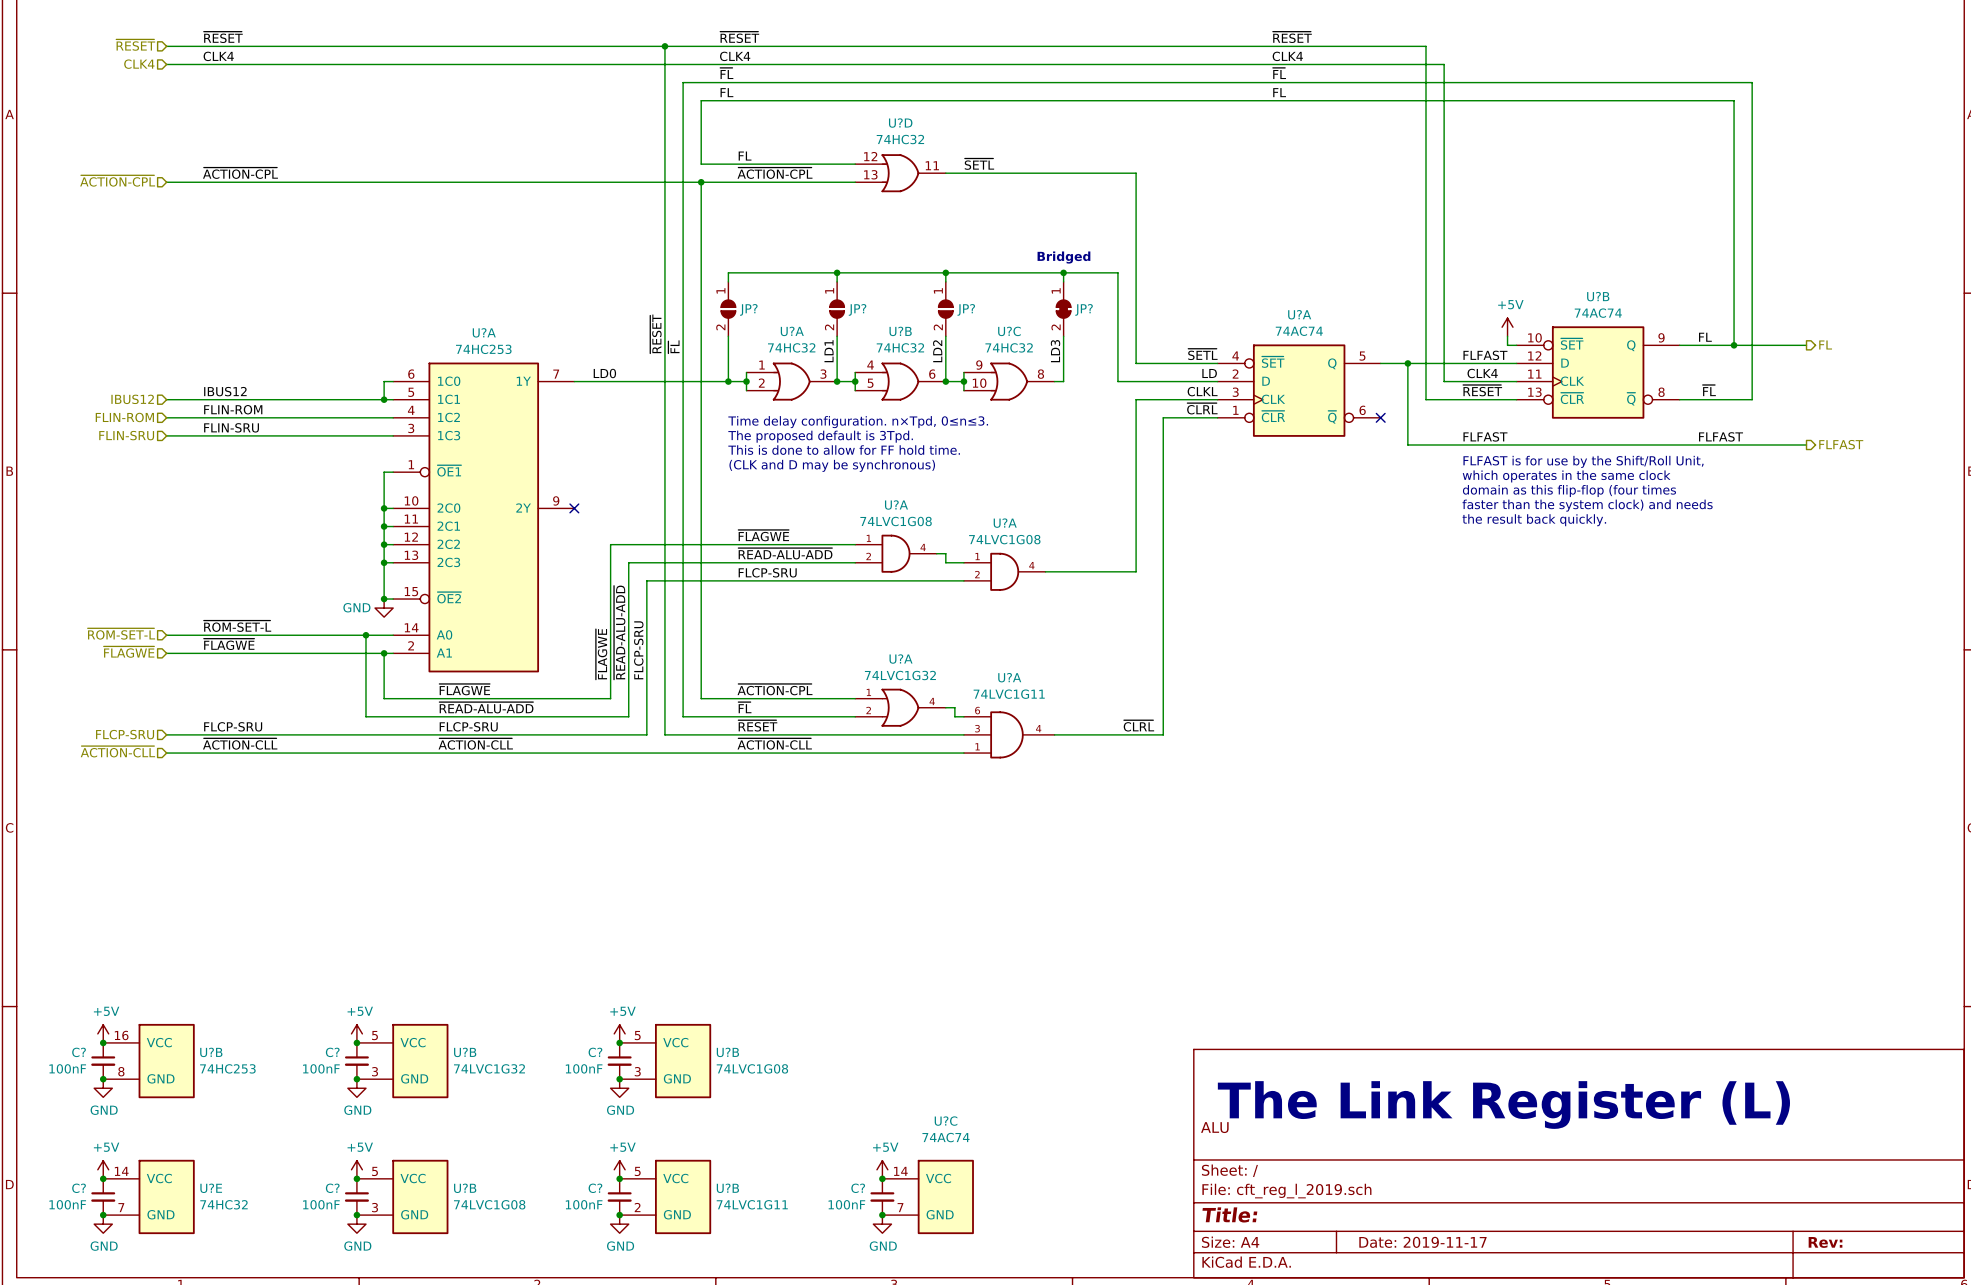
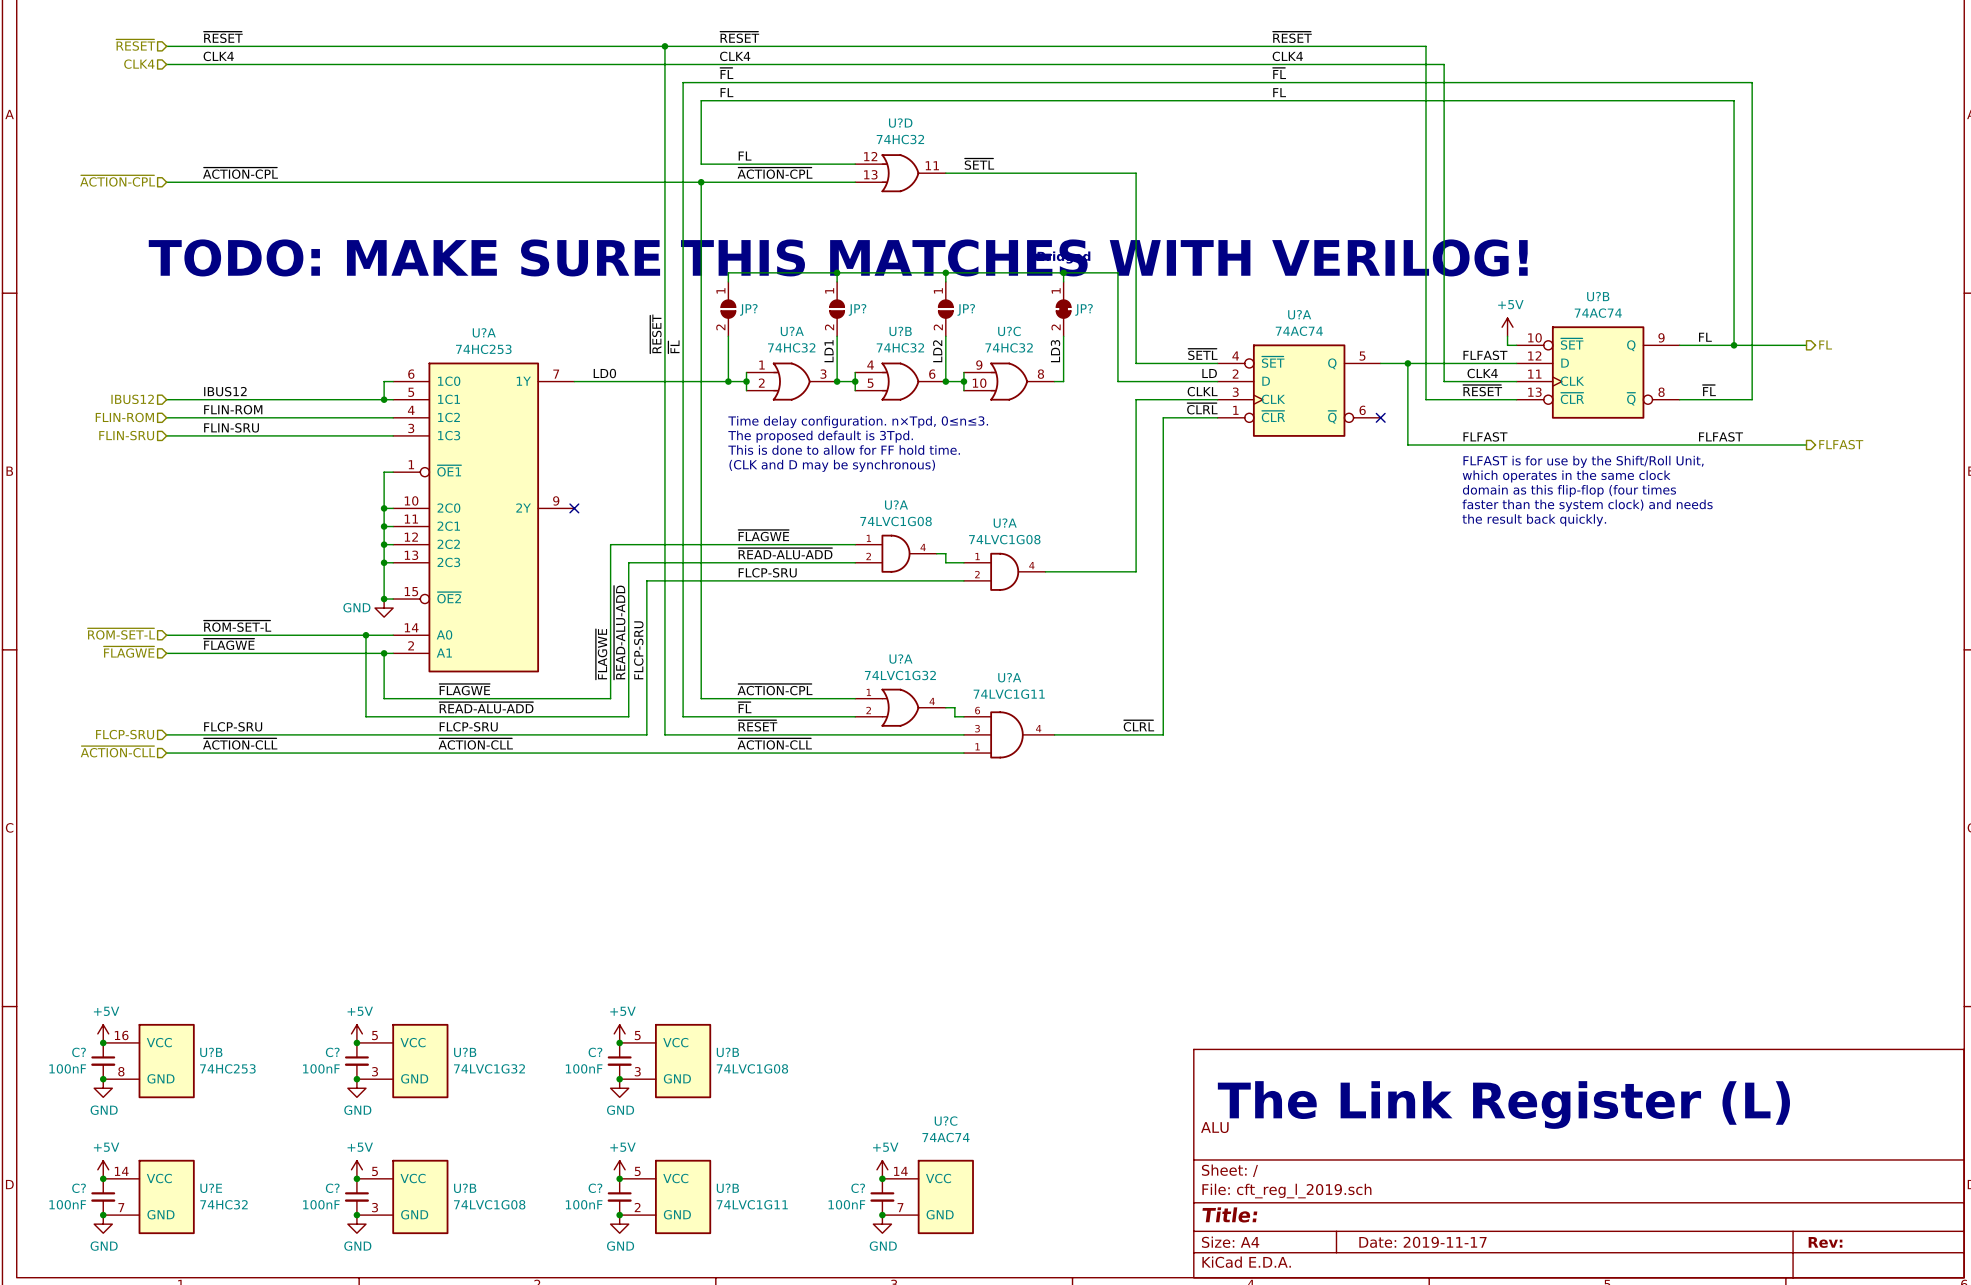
text: none -> TODO: MAKE SURE THIS MATCHES WITH VERILOG! (838, 257)

